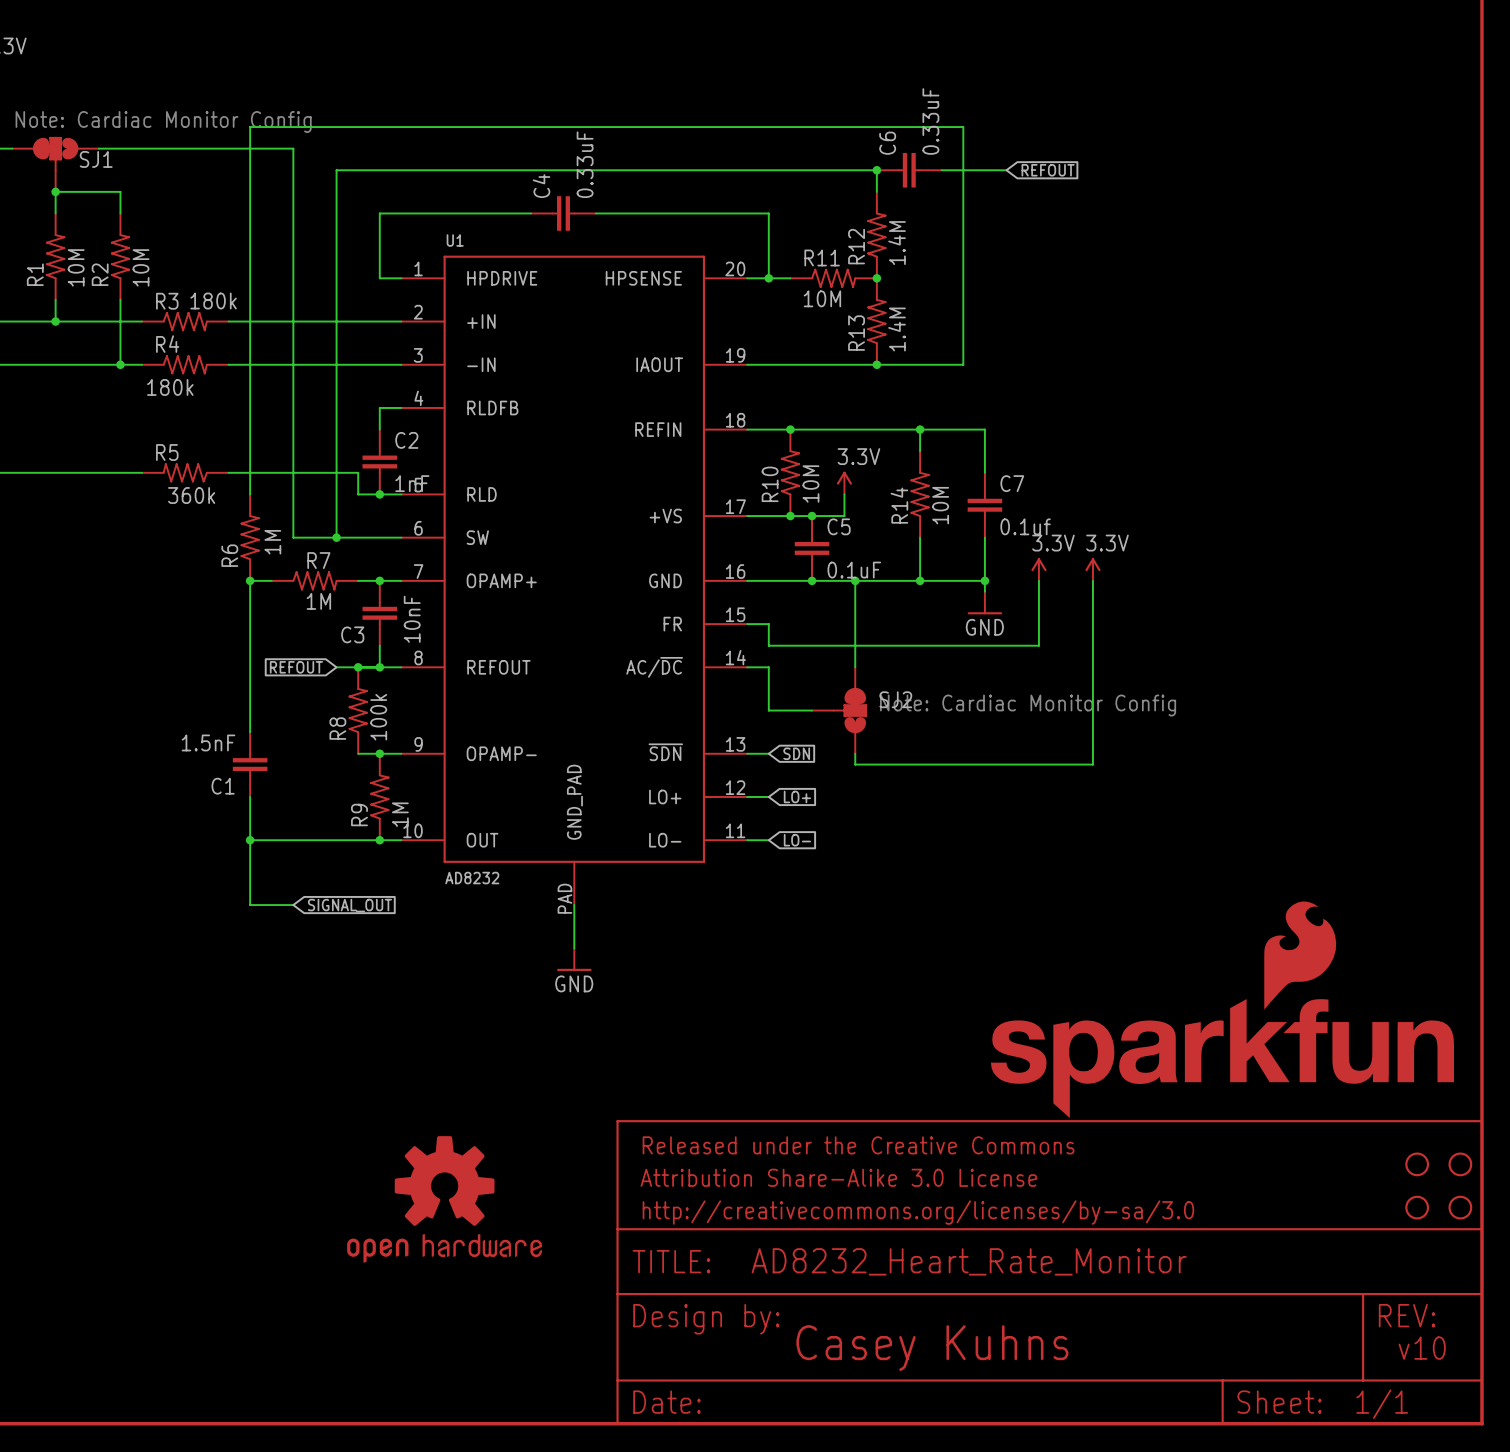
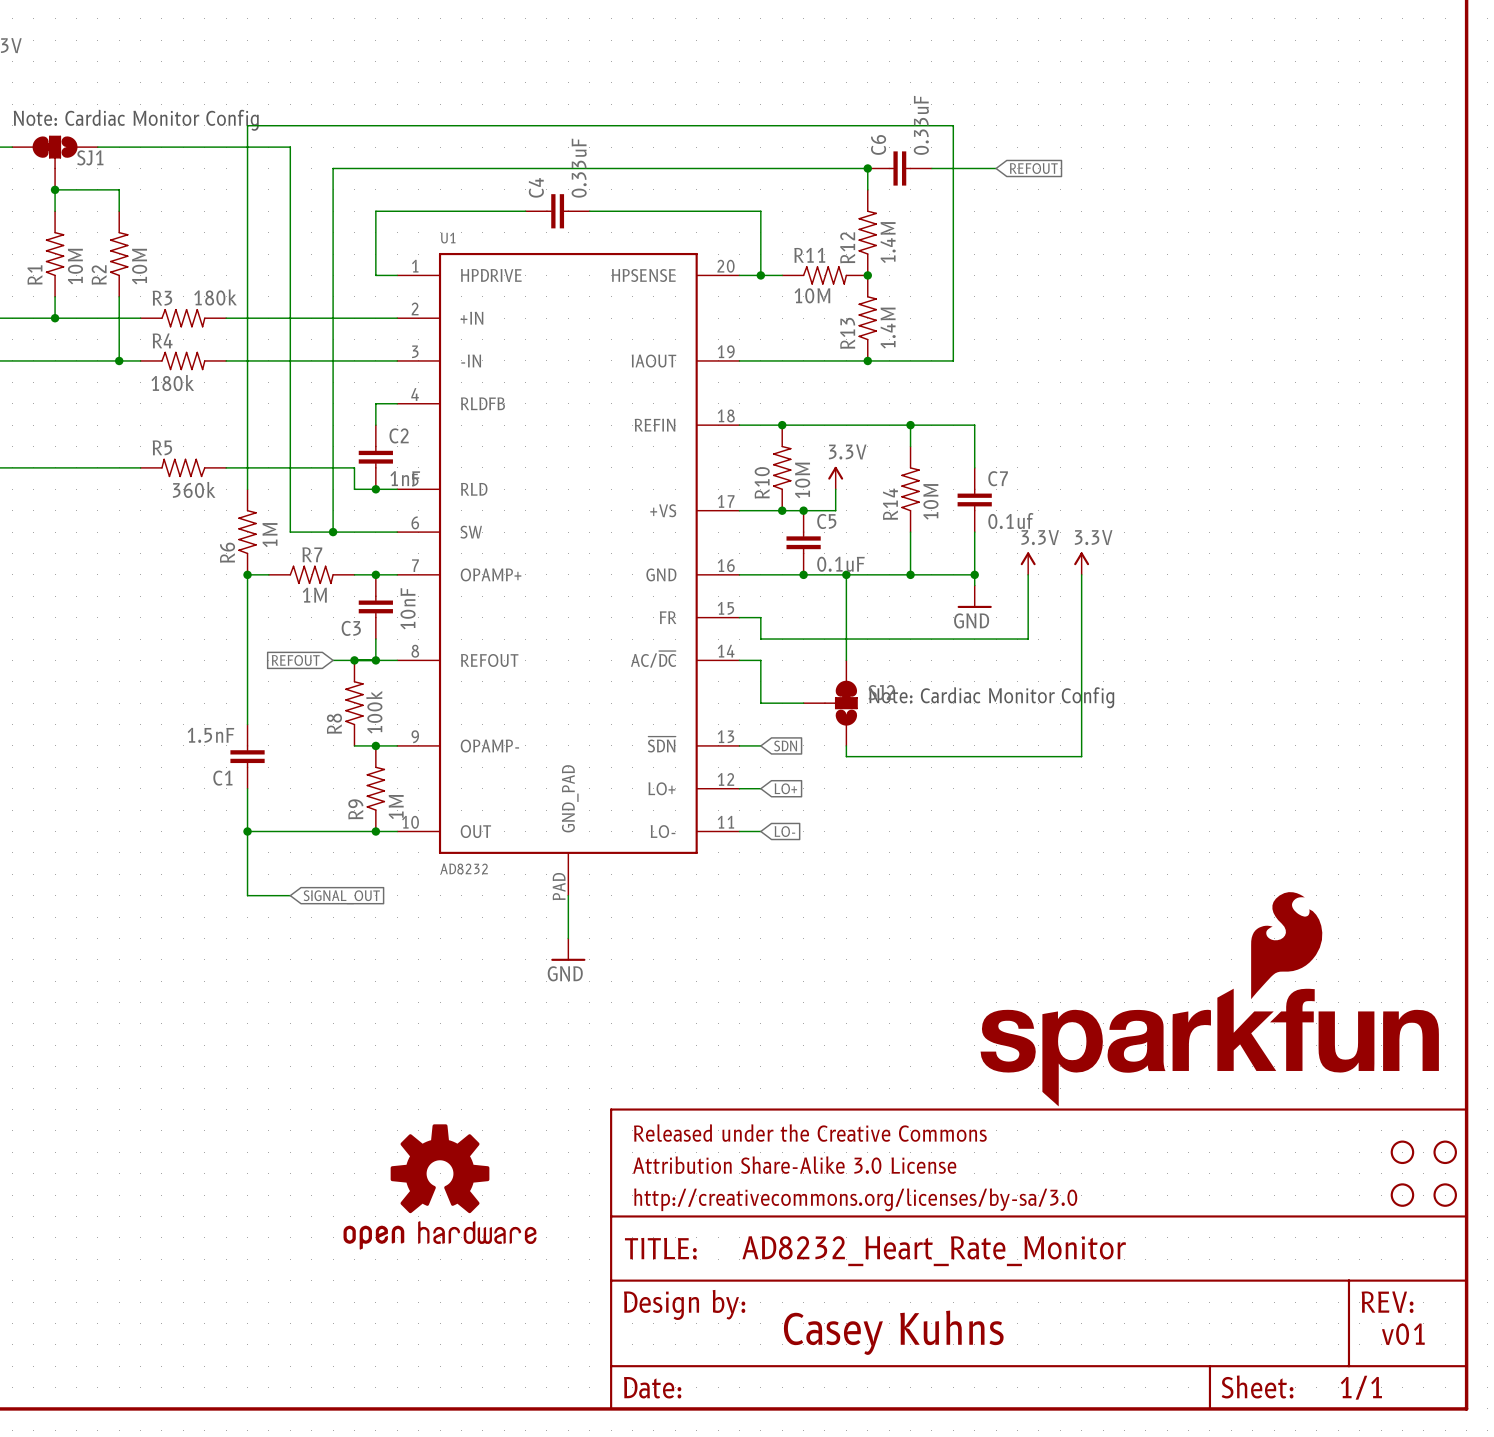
text: v10 (1422, 1348) -> v01 (1403, 1334)

